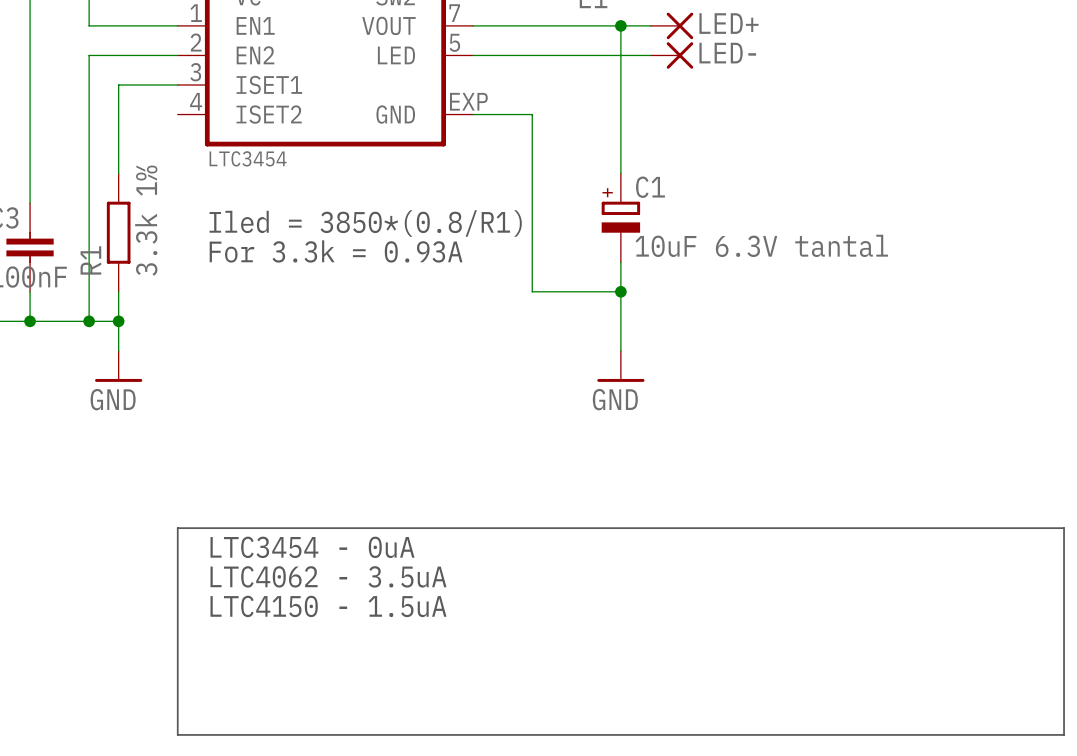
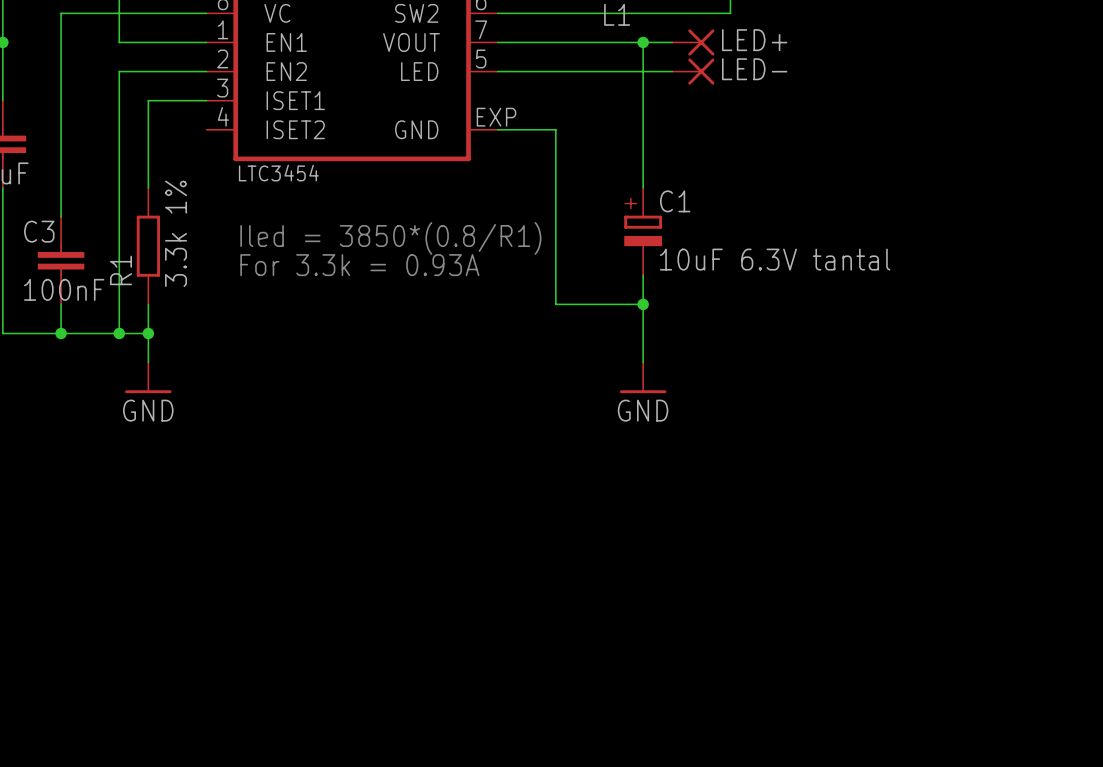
line: (177, 528) (177, 734) (1064, 734) (1064, 528) (177, 528) -> none
text: LTC3454 - 0uA (312, 547) -> none
text: LTC4062 - 3.5uA (328, 576) -> none
text: LTC4150 - 1.5uA (328, 606) -> none

